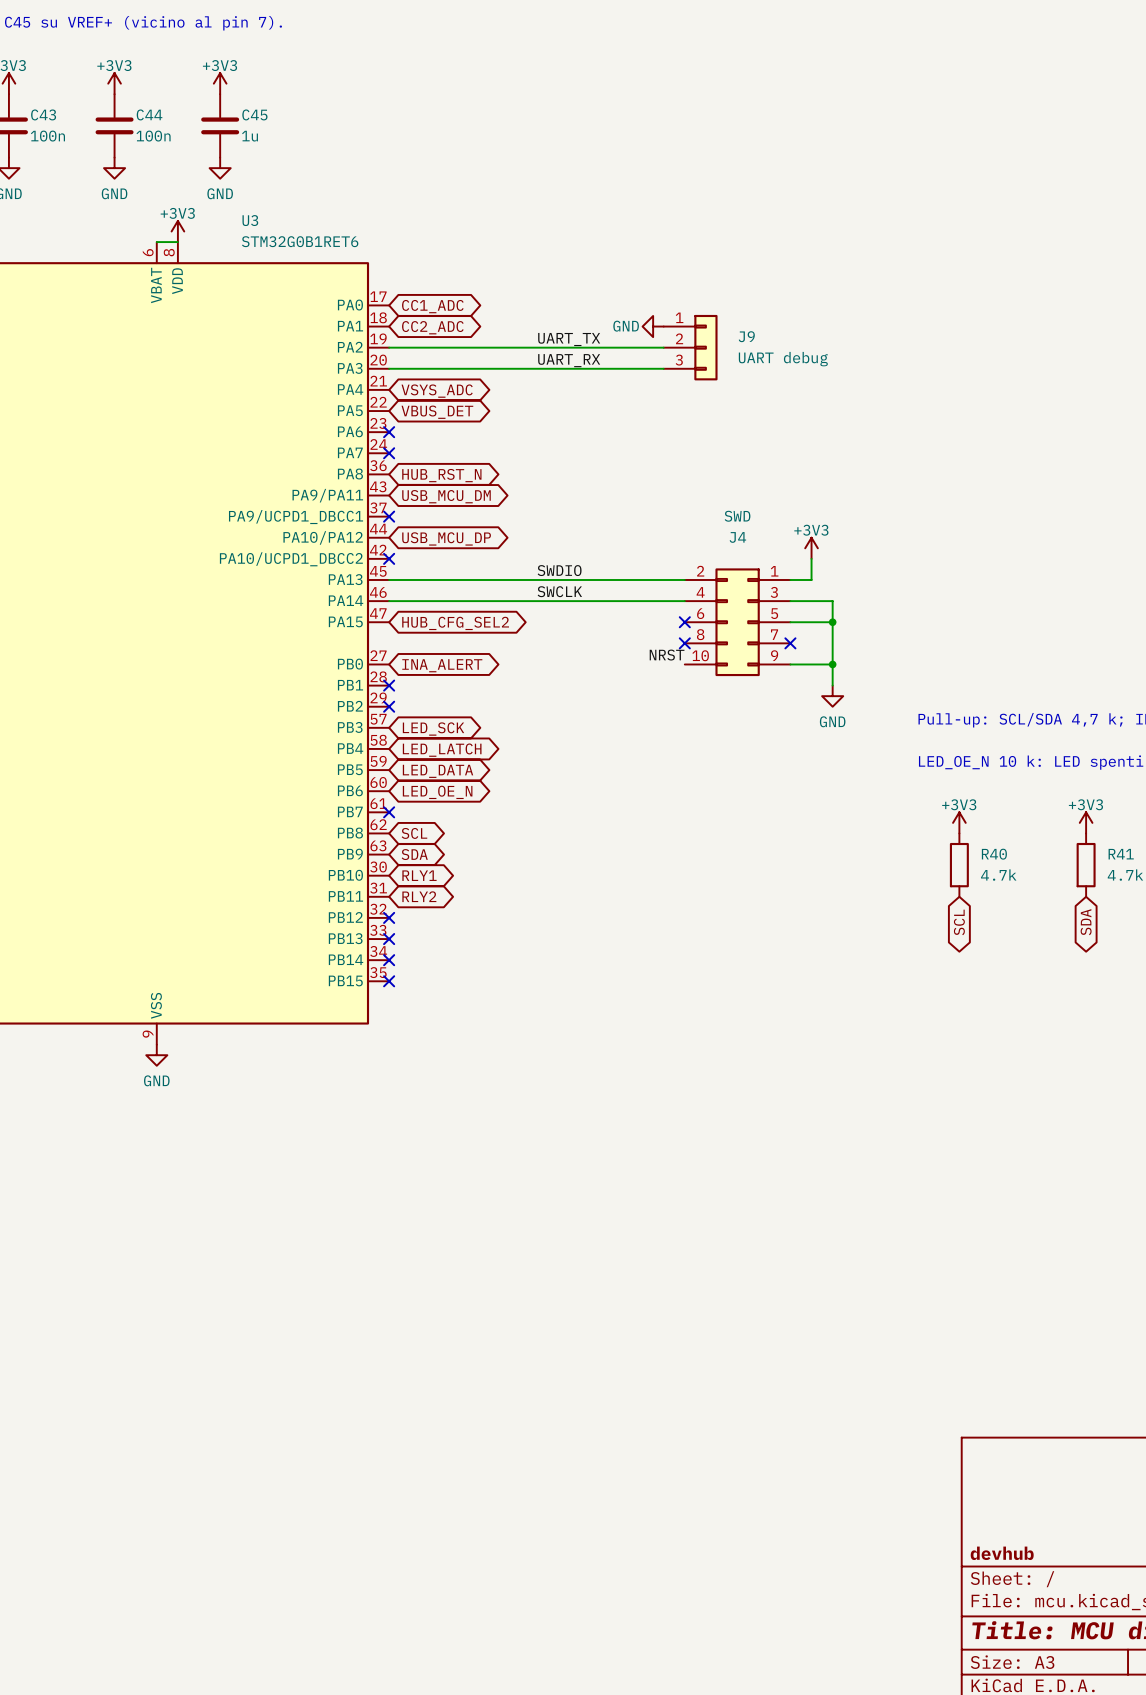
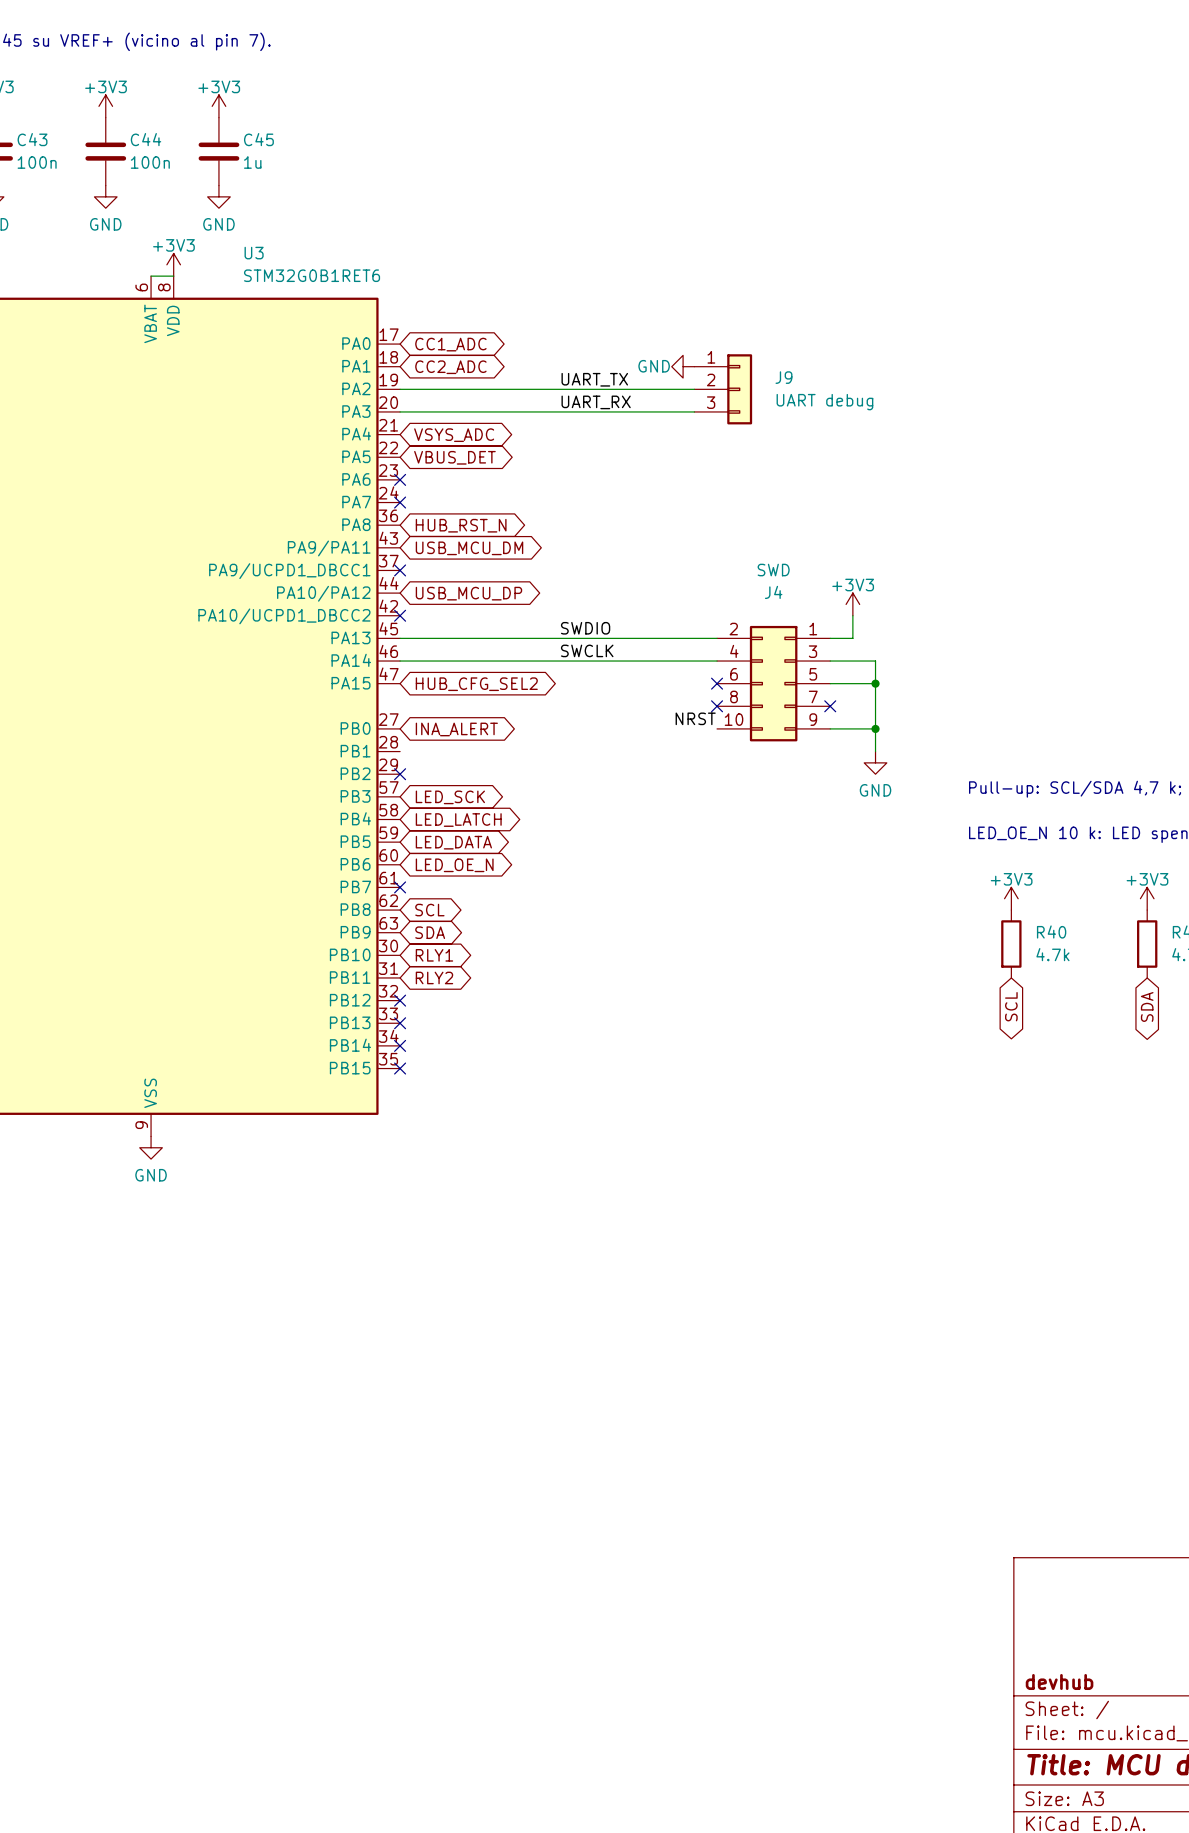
no-connect mark: (389, 685) -> none

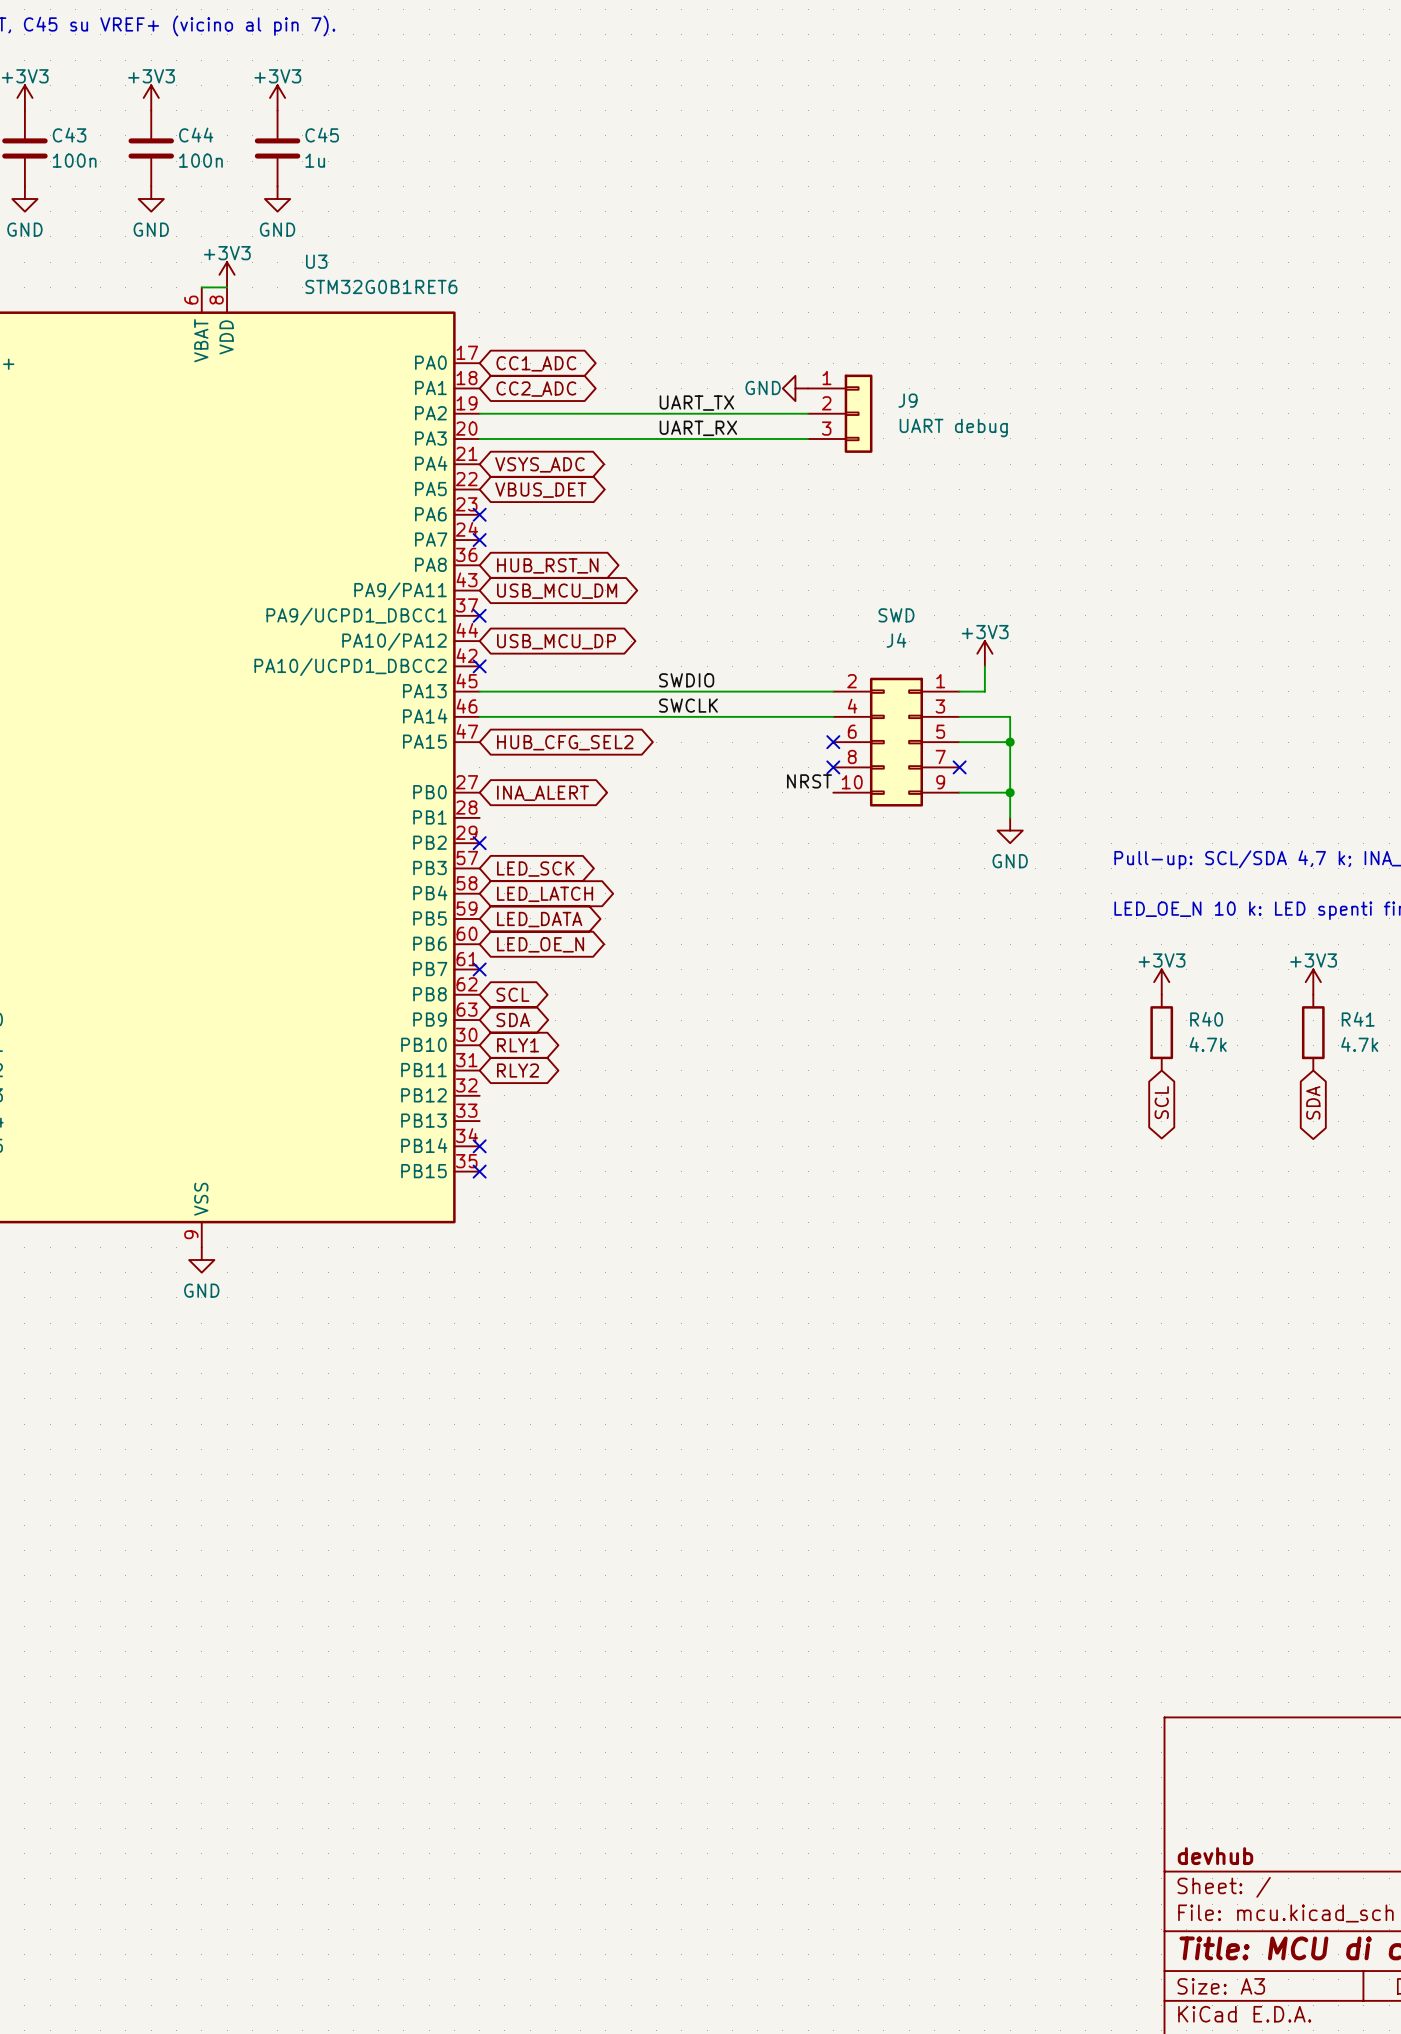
no-connect mark: (400, 1000) -> none
no-connect mark: (400, 1023) -> none

